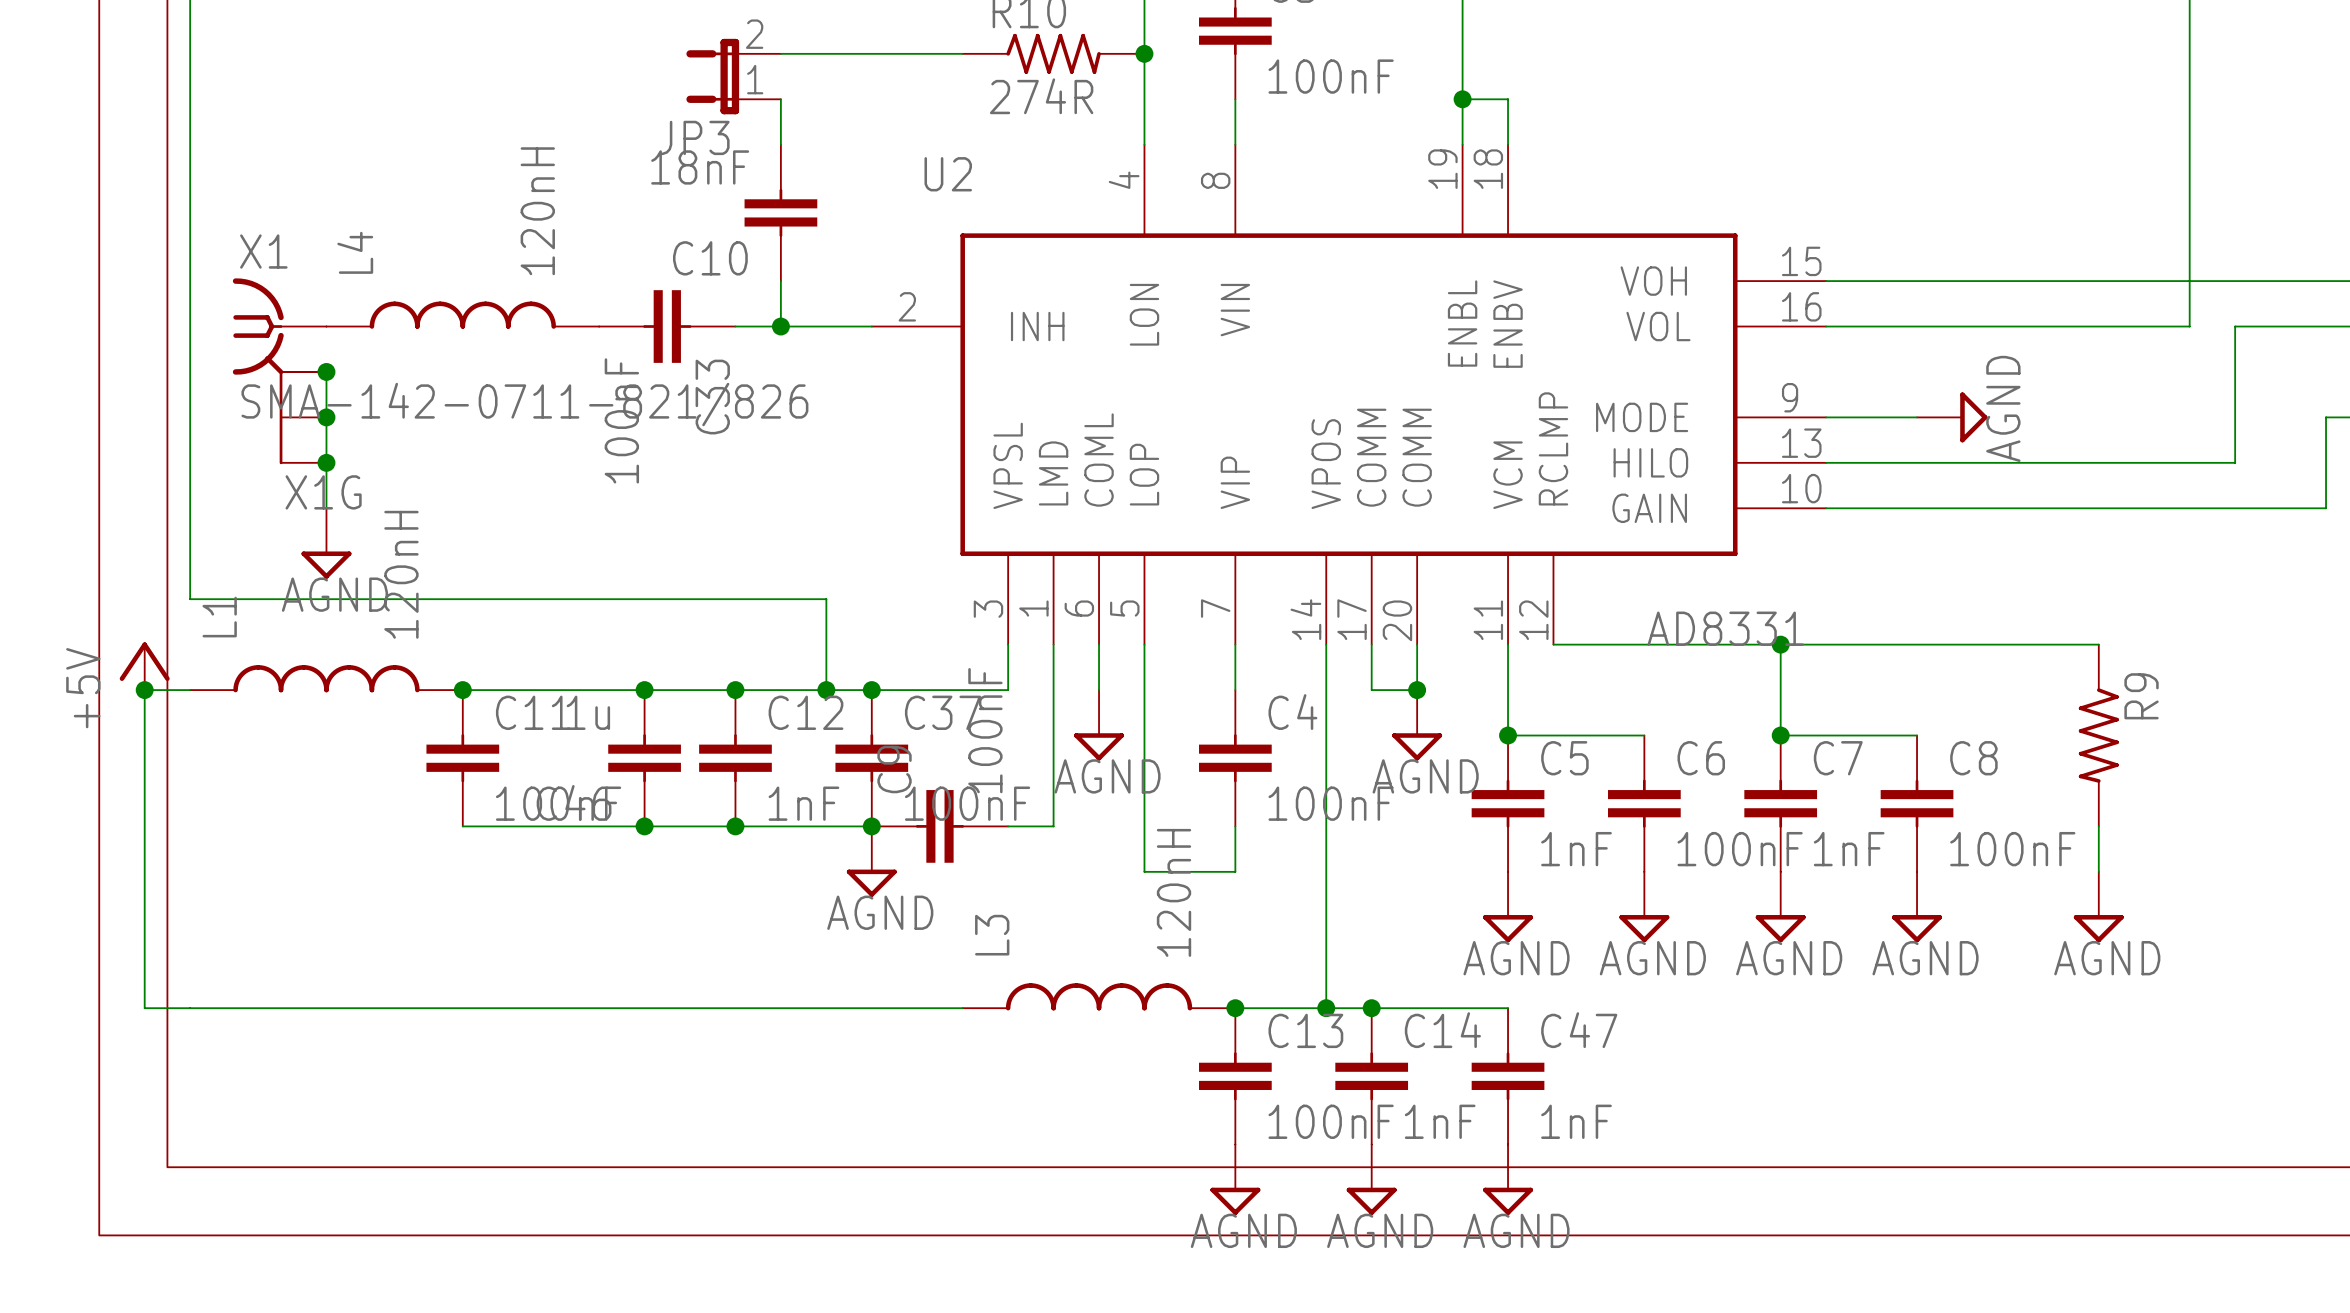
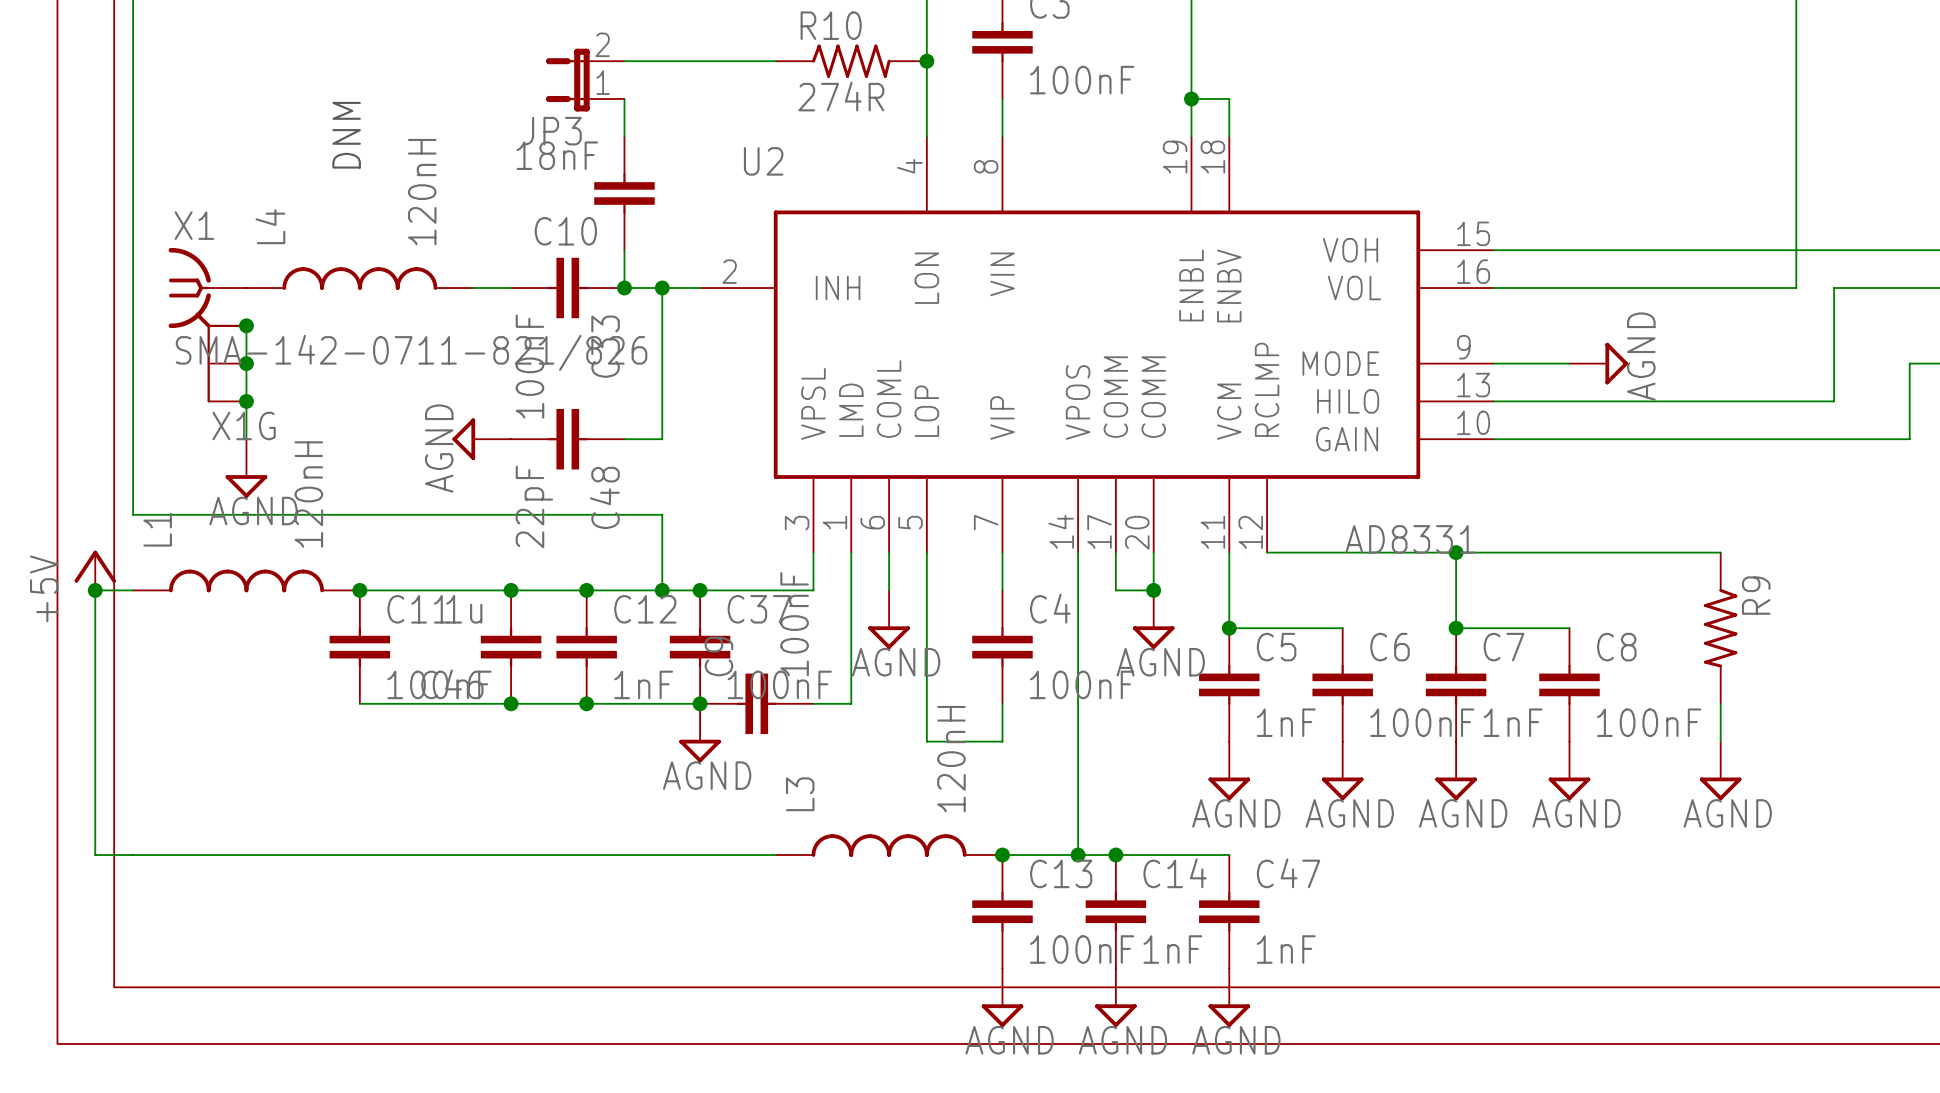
text: none -> DNM (346, 135)
C33 position: (667, 326) -> (567, 288)
wire: none -> (662, 288) (662, 439) (624, 439)
junction: none -> (662, 288)
power symbol: none -> AGND (481, 439)
C48: none -> 22pF (567, 439)

